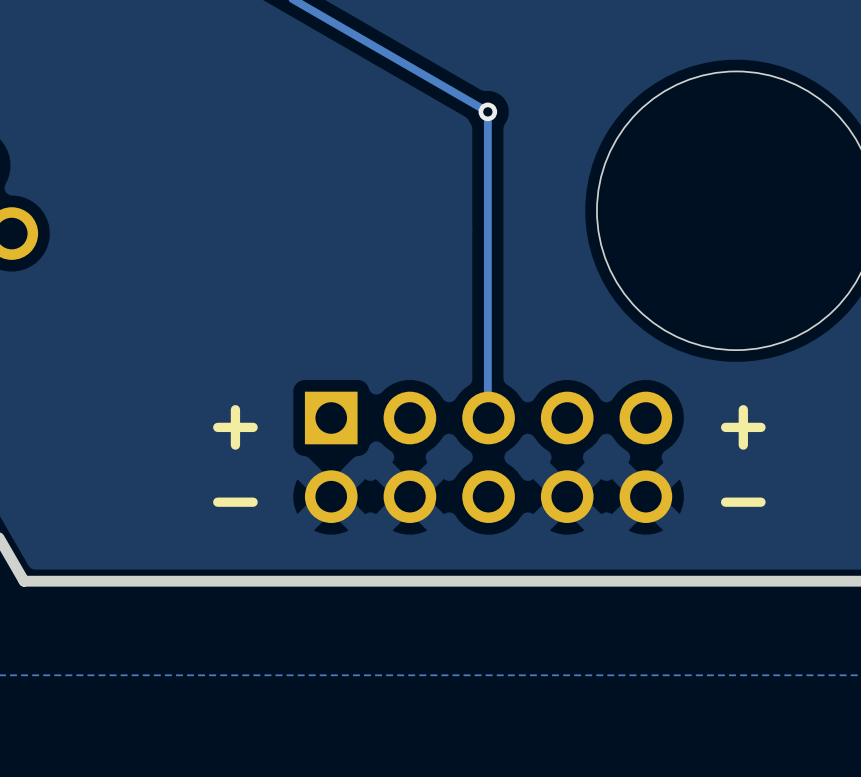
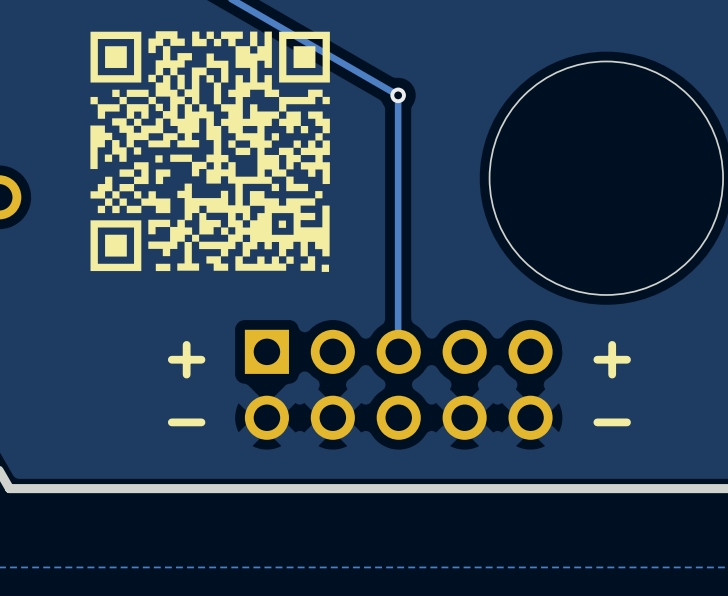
drawing: none -> [90, 31, 330, 272]

